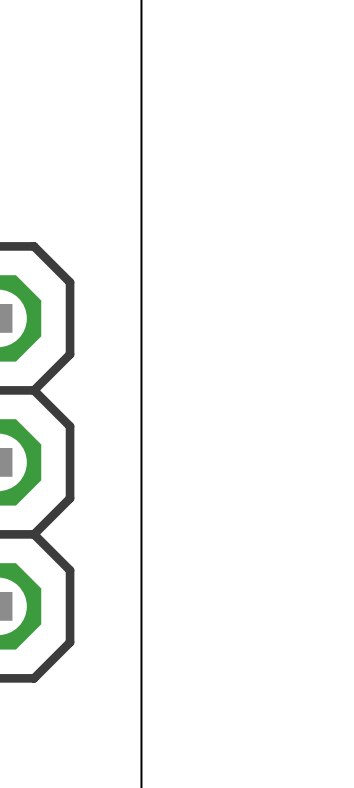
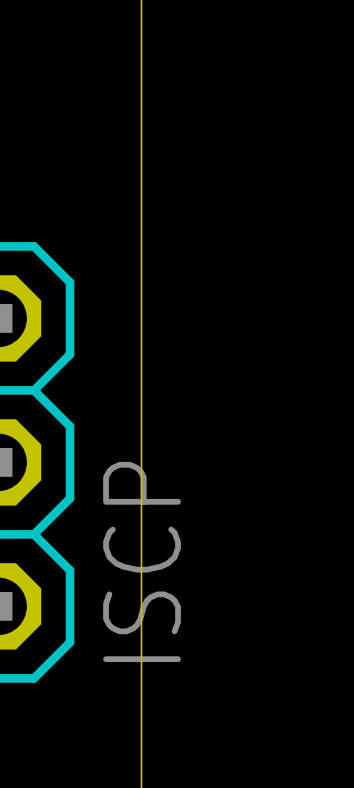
part value: none -> ISCP (142, 561)

